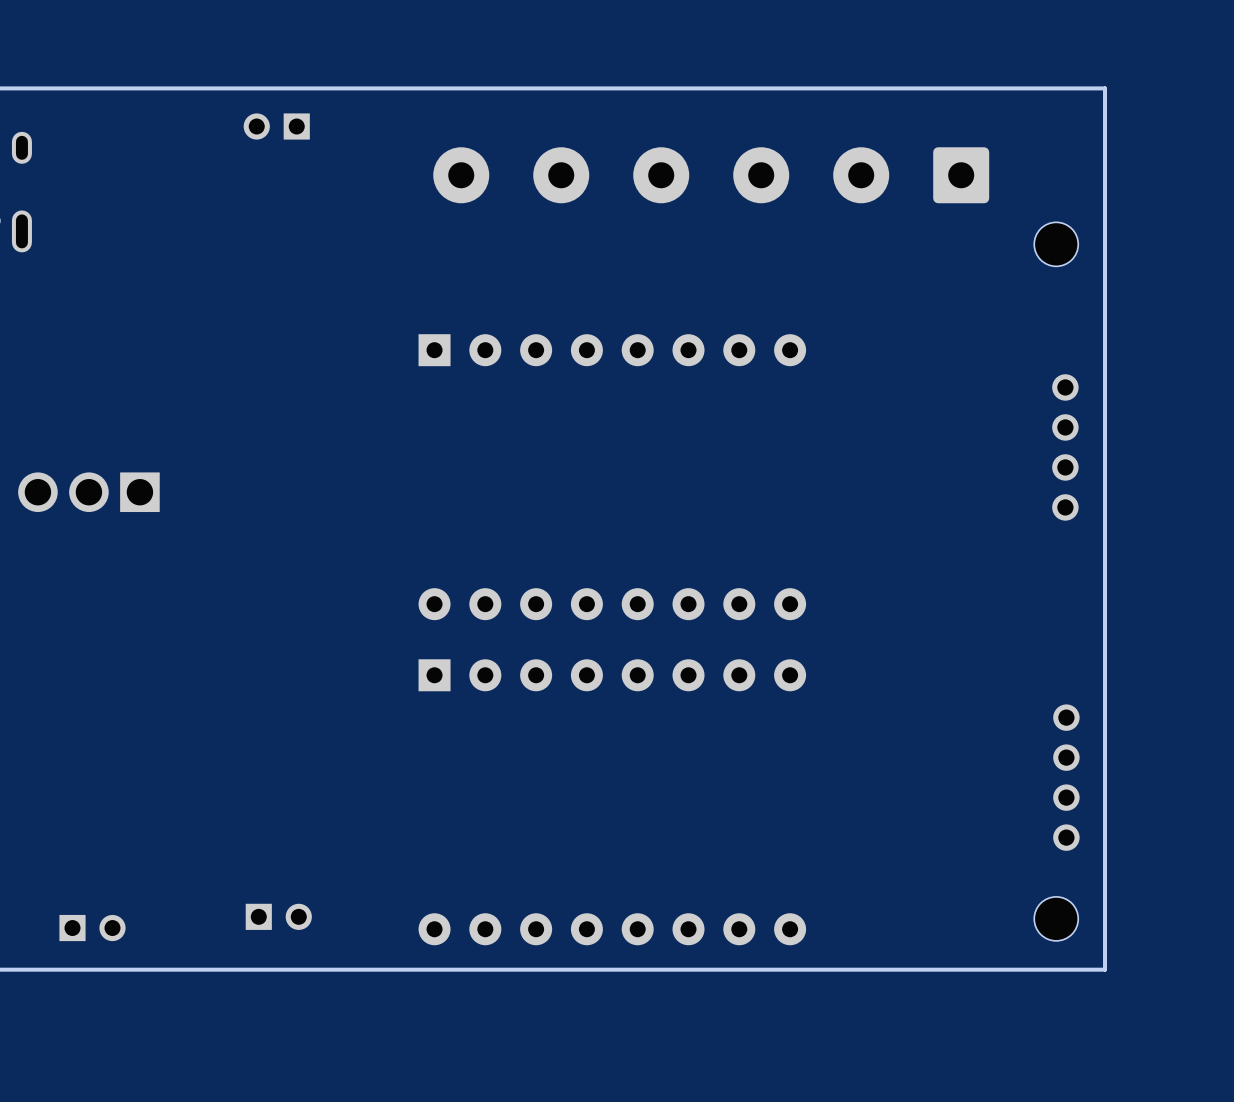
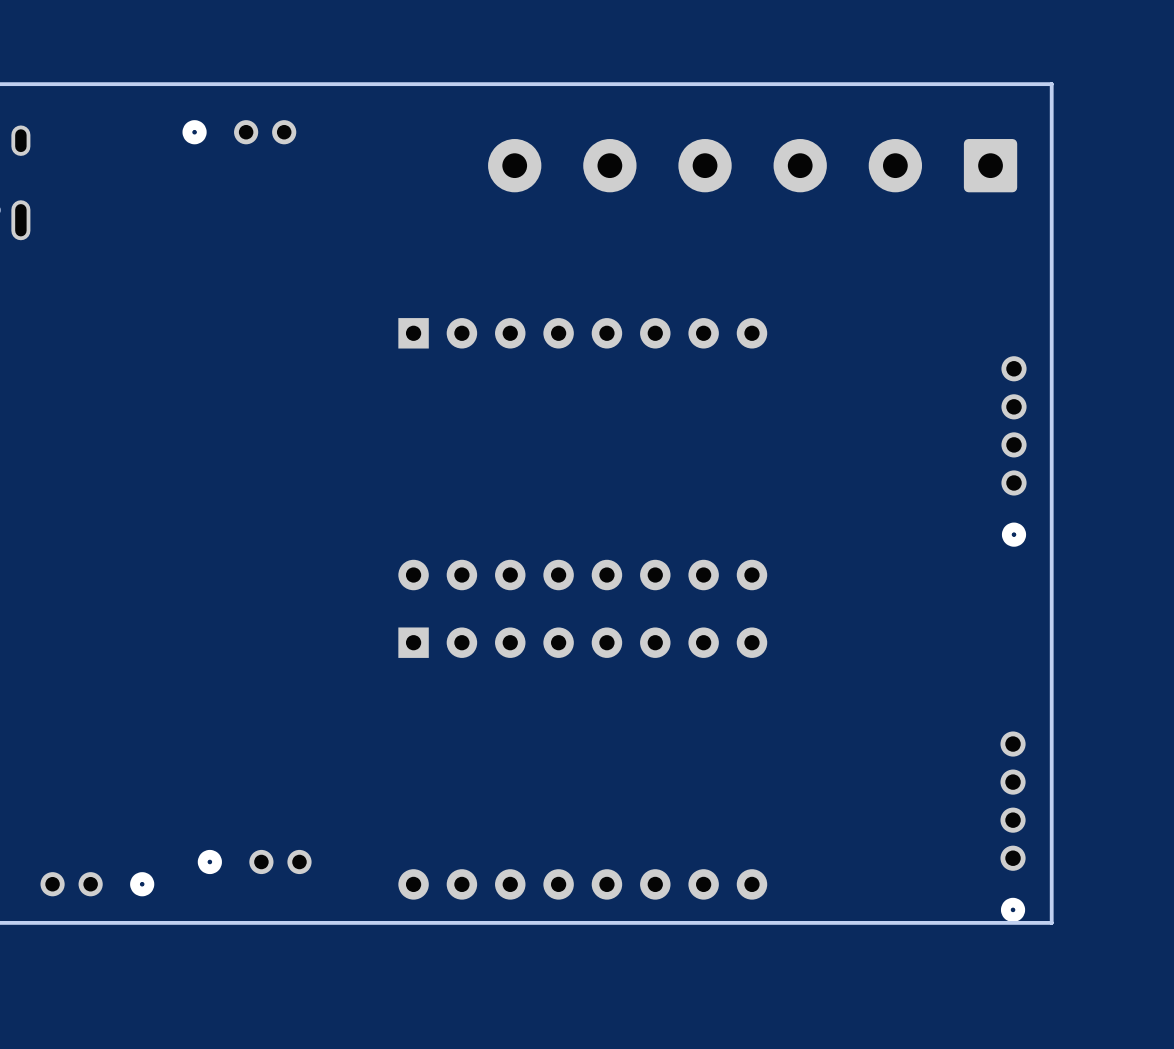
part: (276, 126) -> none
part: none -> (239, 132)
part position: (711, 175) -> (752, 165)
part: (1056, 244) -> none
part: none -> (1014, 451)
part: (88, 492) -> none
part: (1066, 777) -> none
part: none -> (1013, 826)
part footprint: [245, 903, 312, 930] -> [197, 849, 312, 875]
part footprint: [59, 914, 126, 942] -> [40, 872, 155, 897]
part: (1056, 918) -> none

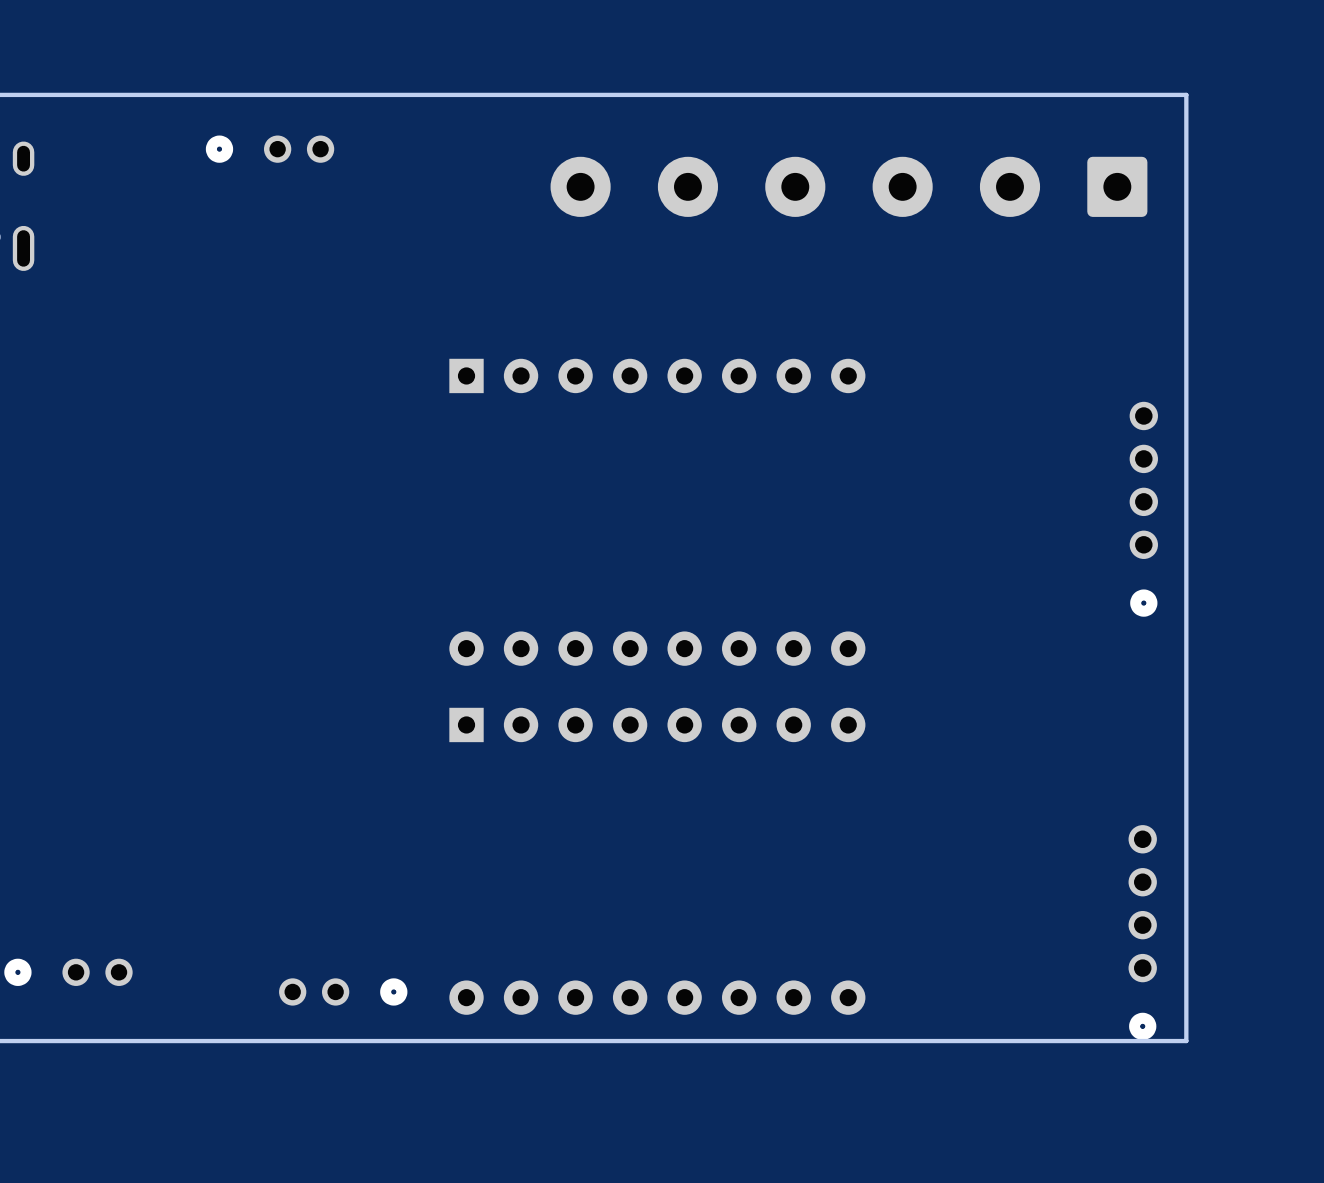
part rotation: 0° (254, 861) -> 180° (343, 991)
part rotation: 0° (97, 884) -> 180° (68, 972)

